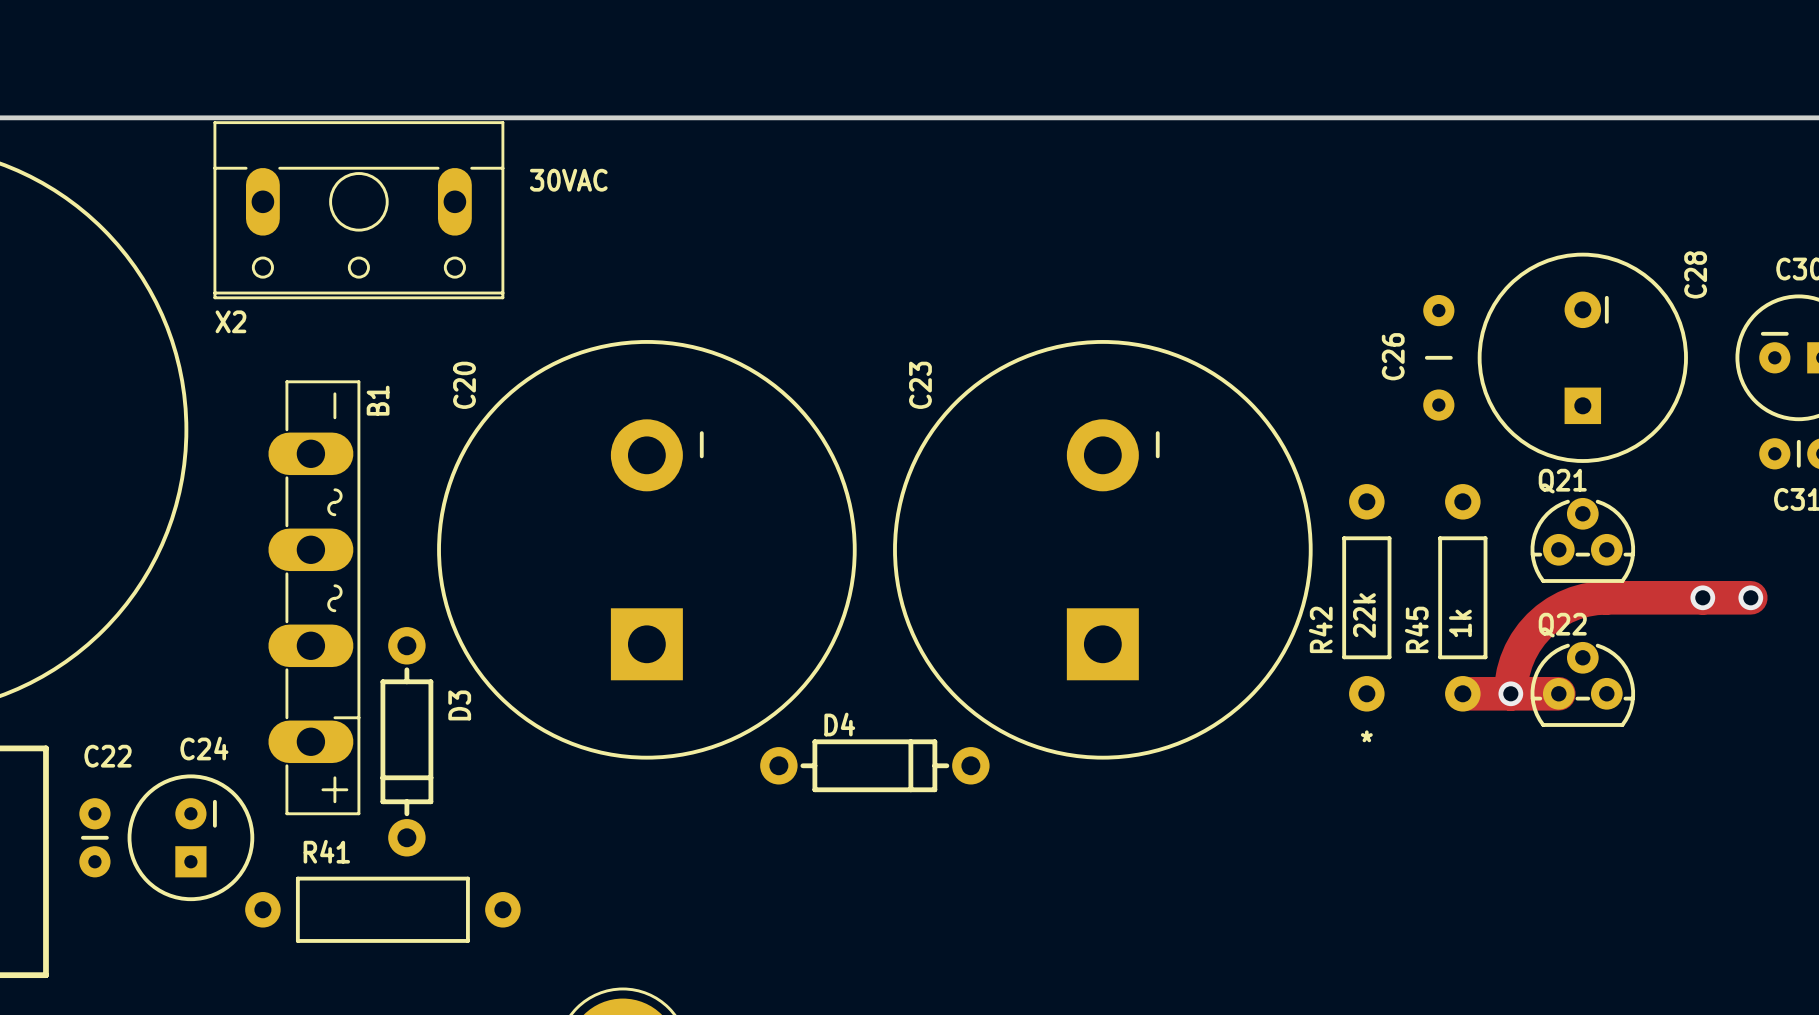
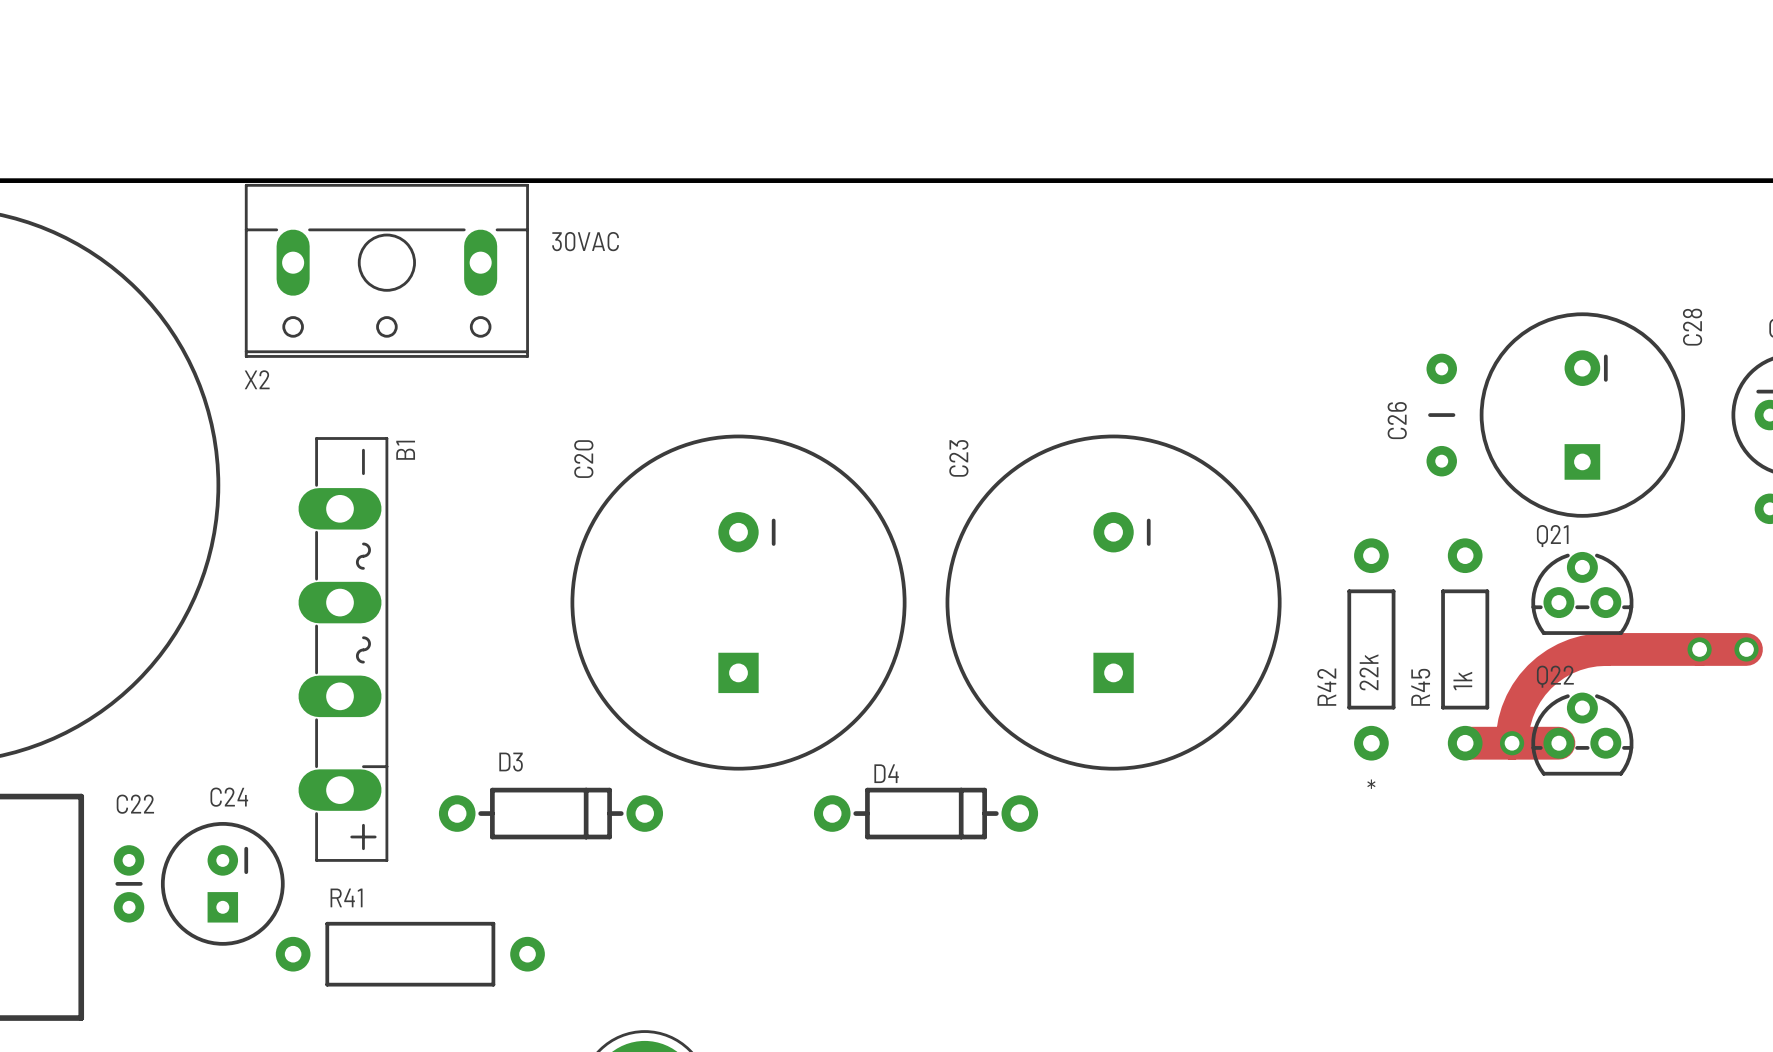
C20 footprint: [437, 340, 857, 760] -> [570, 434, 907, 771]
C23 footprint: [893, 340, 1313, 760] -> [945, 434, 1282, 771]
D3 rotation: 0° (406, 741) -> 90° counterclockwise (550, 813)
D4 position: (874, 765) -> (926, 813)

